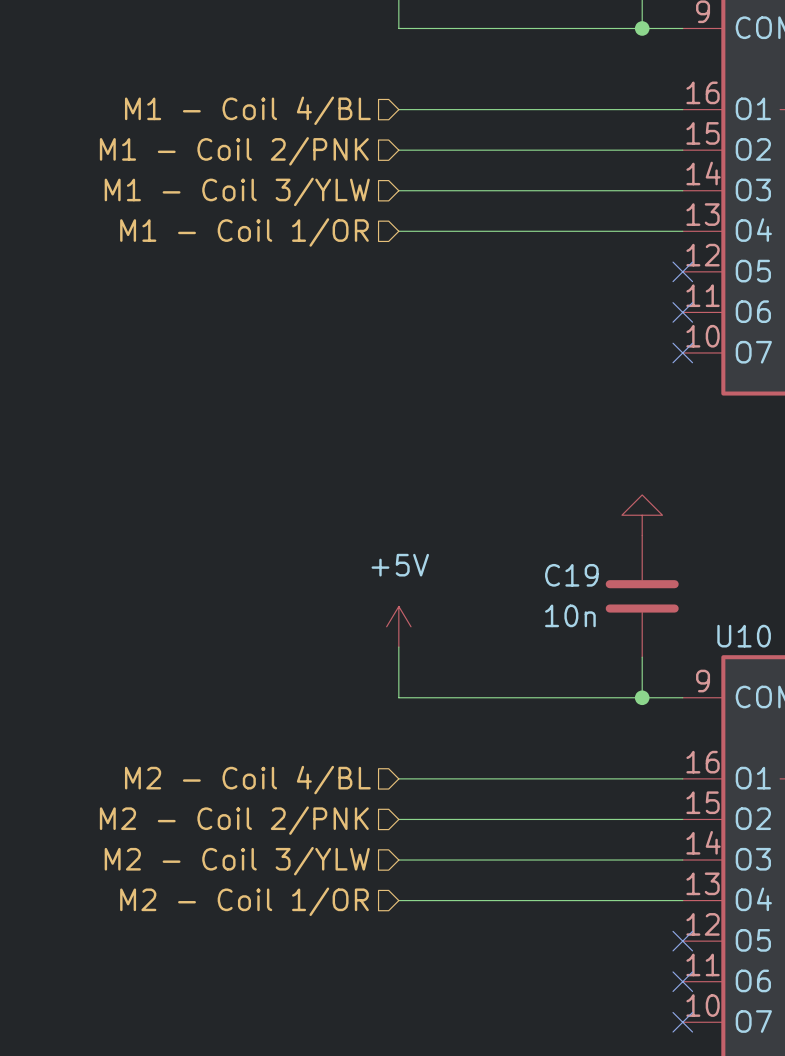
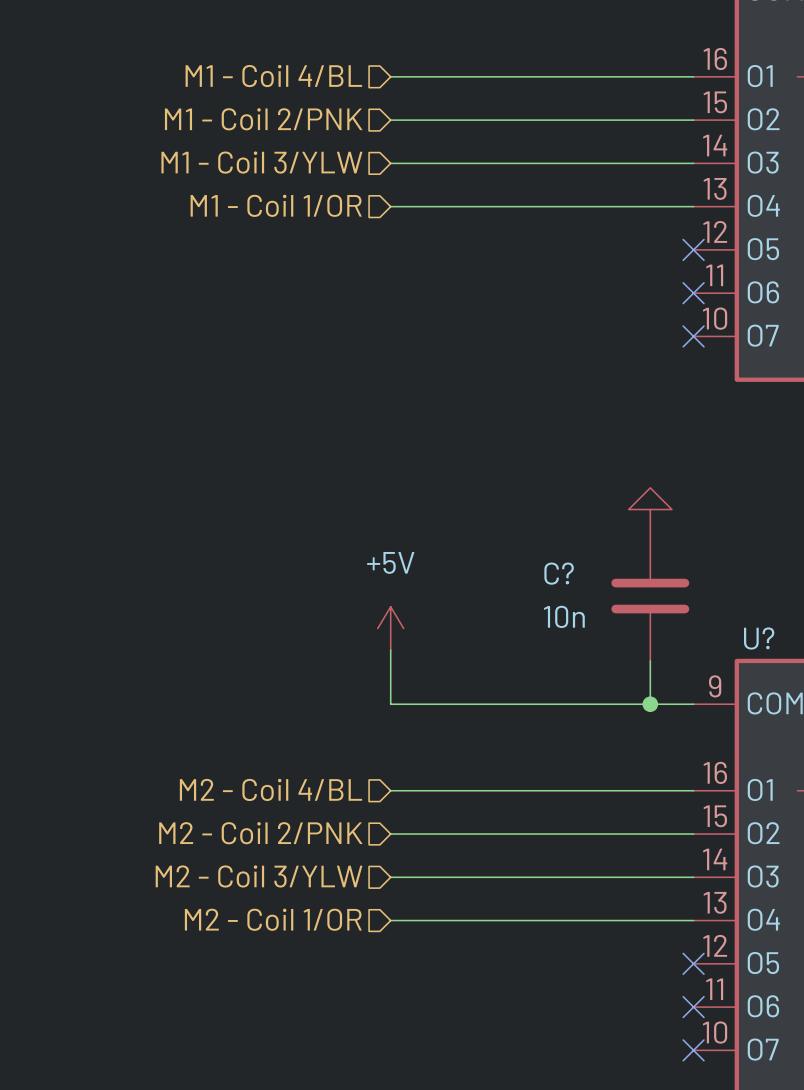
C19 name: C19 (571, 575) -> C? (559, 573)
U10 name: U10 (744, 636) -> U? (759, 638)

